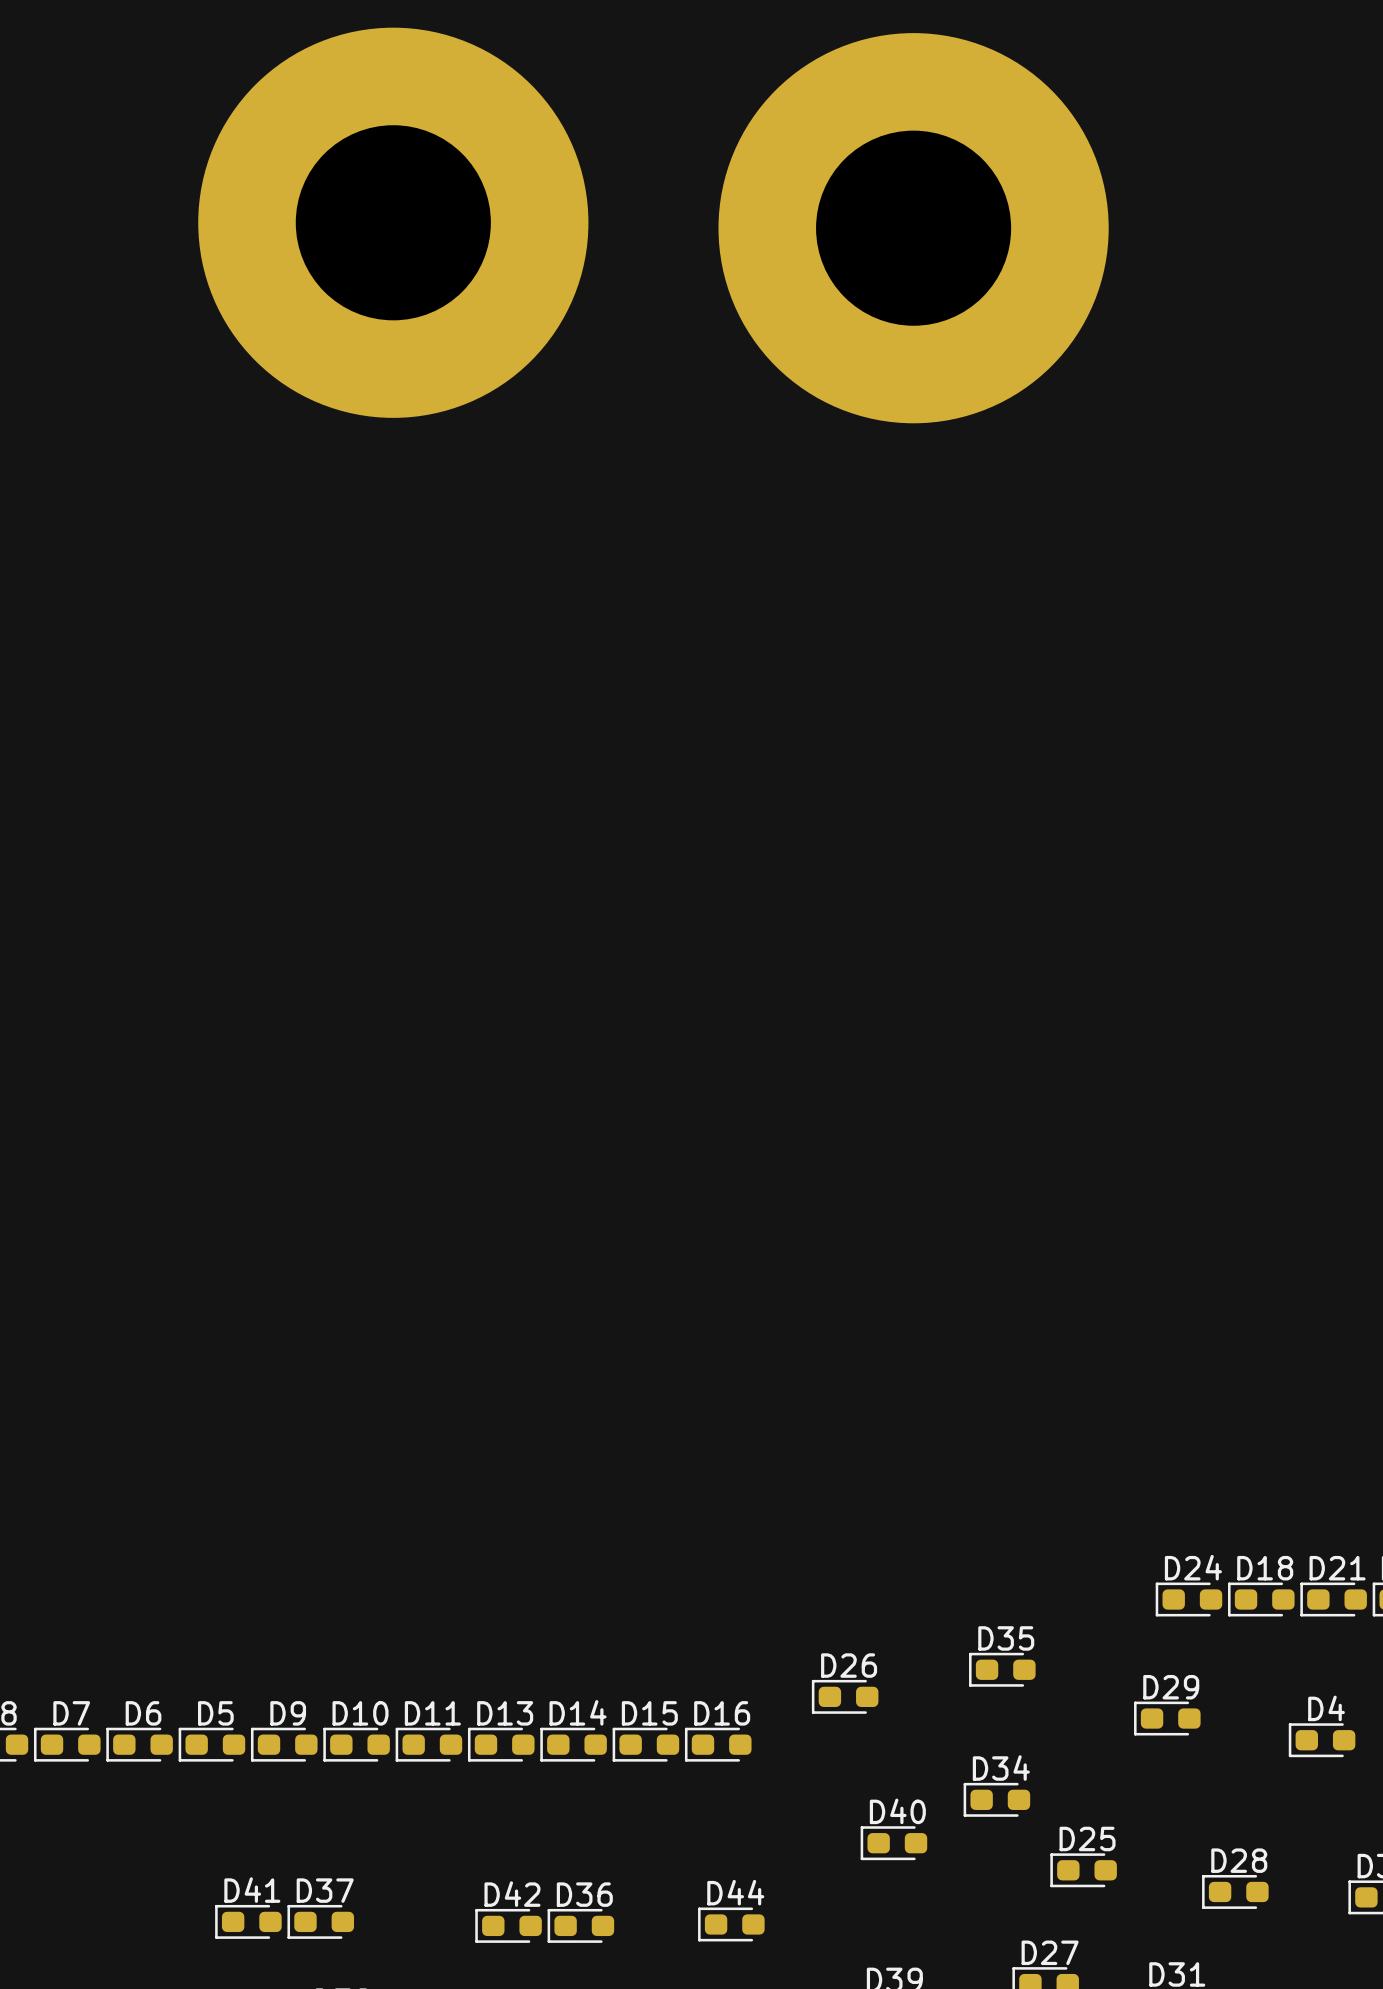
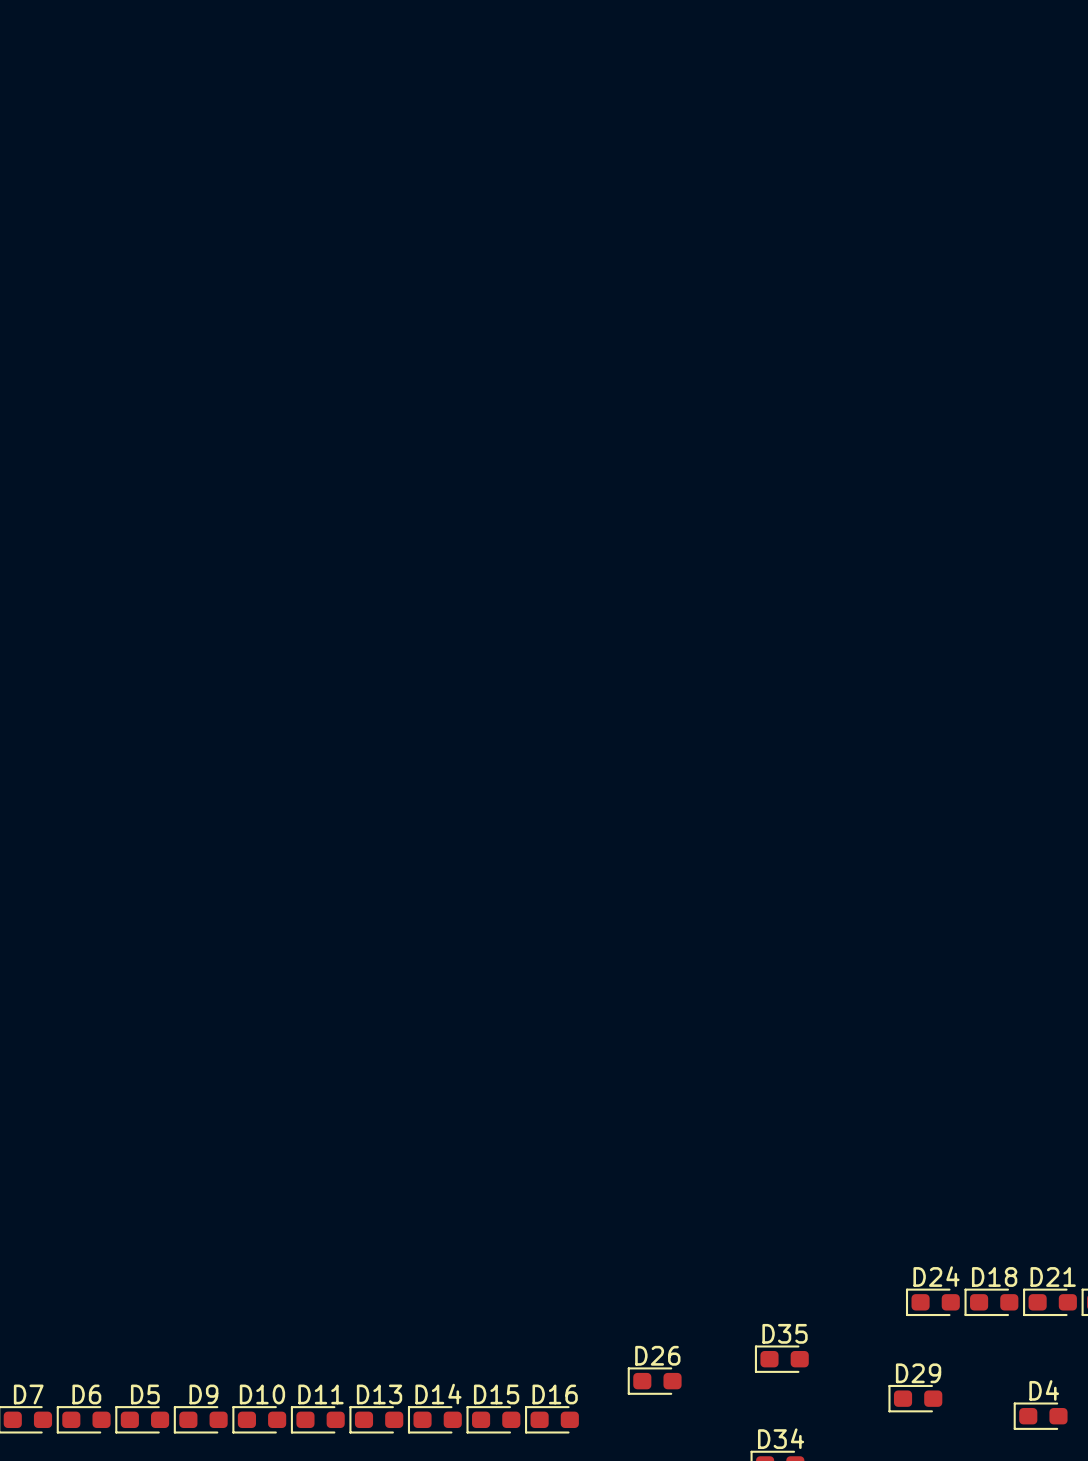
part: (393, 222) -> none
part: (913, 228) -> none

